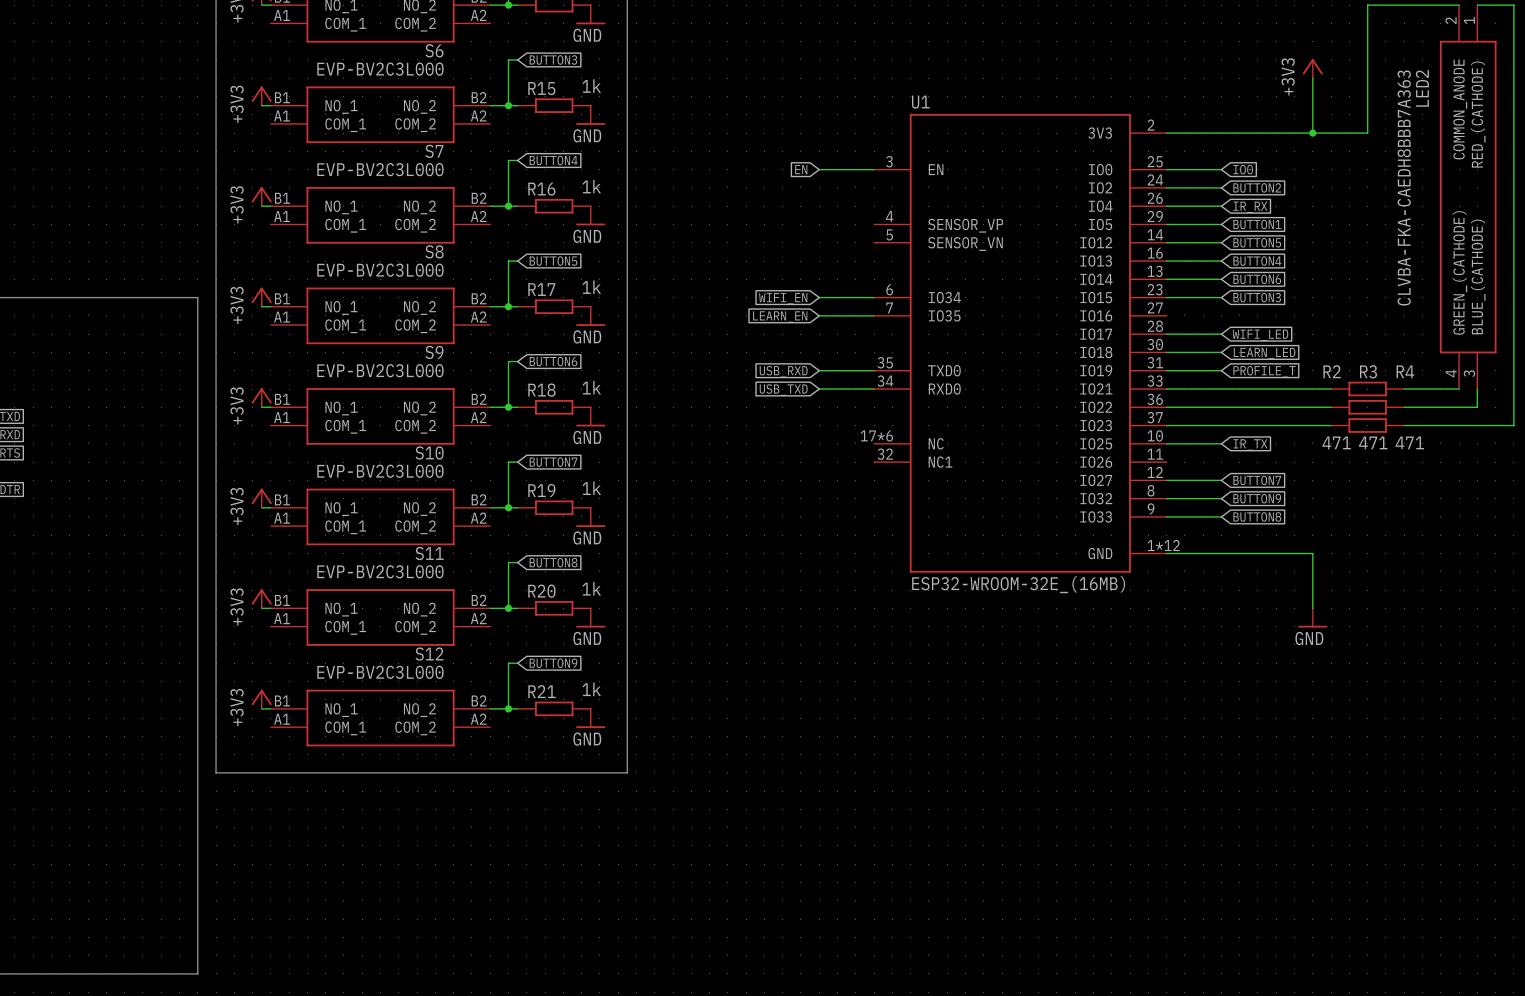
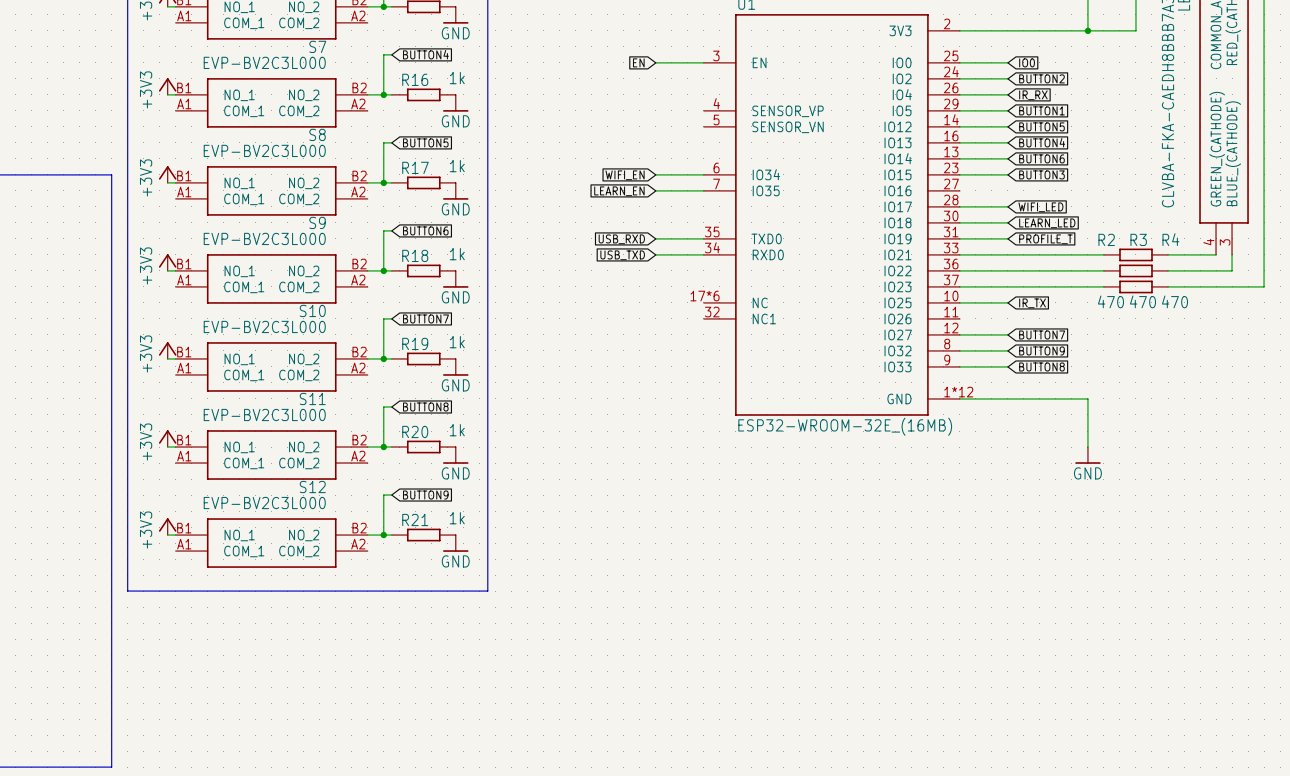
R2 value: 471 (1336, 442) -> 470 (1110, 301)
R3 value: 471 (1373, 442) -> 470 (1142, 301)
R4 value: 471 (1409, 442) -> 470 (1174, 301)

